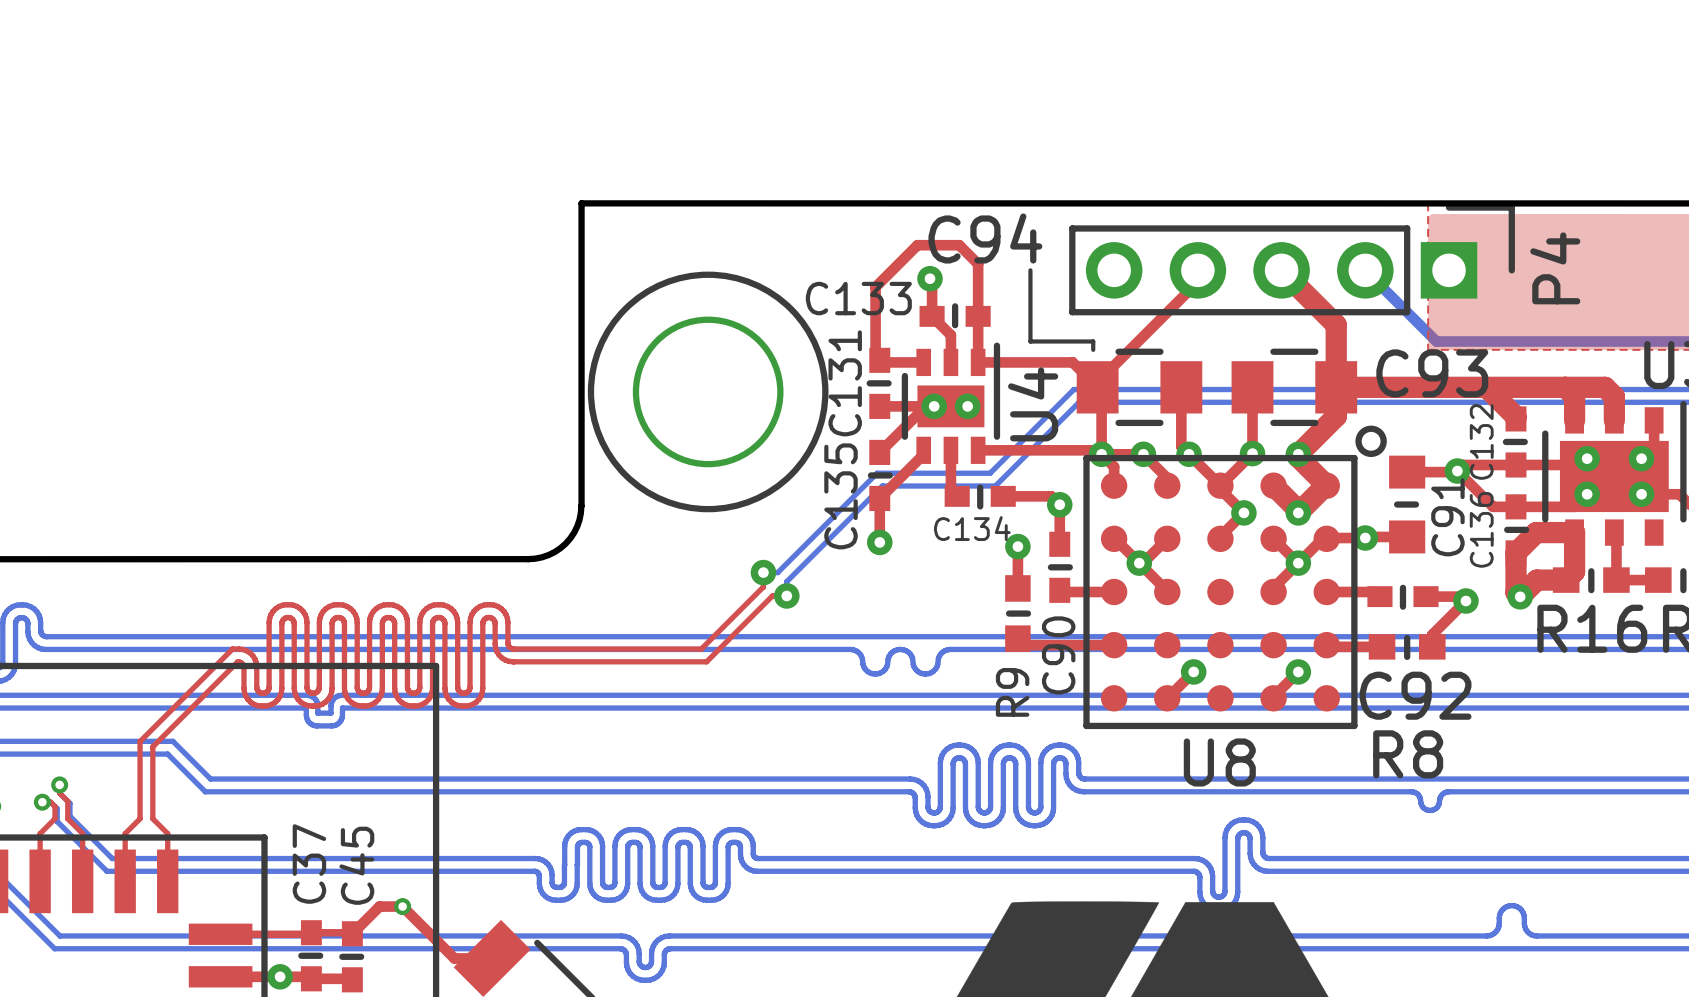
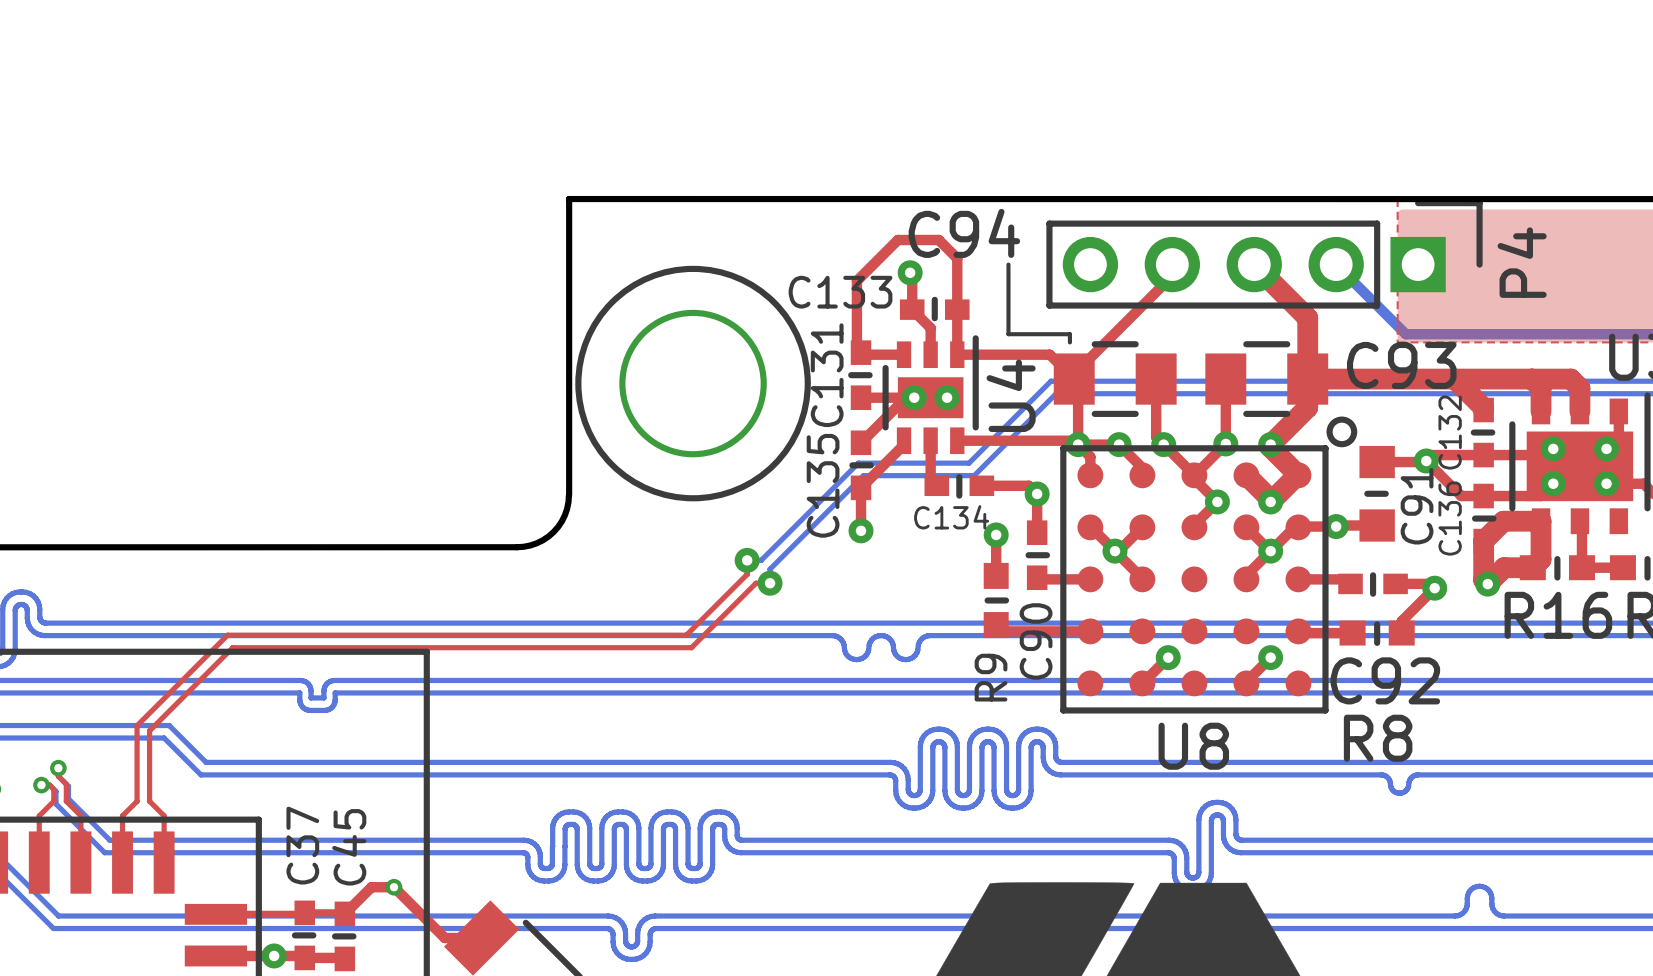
top track: (238, 649) (250, 652) (255, 659) (256, 688) (262, 693) (267, 691) (269, 687) (269, 618) (273, 611) (282, 605) (296, 606) (303, 611) (306, 618) (306, 687) (311, 693) (317, 692) (319, 687) (319, 618) (323, 611) (333, 605) (347, 606) (353, 611) (356, 618) (357, 687) (362, 693) (367, 692) (369, 687) (370, 618) (373, 611) (383, 605) (397, 606) (403, 611) (407, 618) (407, 687) (412, 693) (417, 692) (419, 687) (420, 618) (423, 611) (429, 606) (443, 605) (450, 608) (455, 614) (457, 622) (457, 687) (461, 692) (466, 692) (469, 688) (470, 622) (471, 614) (476, 608) (490, 604) (497, 606) (504, 611) (507, 618) (508, 644) (514, 649) -> (233, 635) (503, 635)
top track: (237, 661) (243, 666) (245, 696) (250, 702) (261, 706) (275, 702) (281, 692) (281, 623) (286, 617) (291, 618) (294, 623) (294, 692) (300, 702) (308, 705) (322, 704) (328, 699) (331, 692) (332, 623) (336, 617) (342, 618) (344, 623) (344, 692) (351, 702) (358, 705) (372, 704) (378, 699) (381, 692) (382, 623) (387, 617) (392, 618) (394, 623) (395, 692) (398, 699) (404, 704) (418, 705) (425, 702) (430, 696) (432, 688) (432, 623) (436, 618) (441, 618) (444, 622) (445, 692) (448, 699) (455, 704) (468, 705) (476, 702) (481, 696) (482, 688) (482, 623) (485, 618) (490, 617) (494, 620) (495, 647) (499, 655) (505, 660) (512, 661) -> (232, 647) (502, 647)

